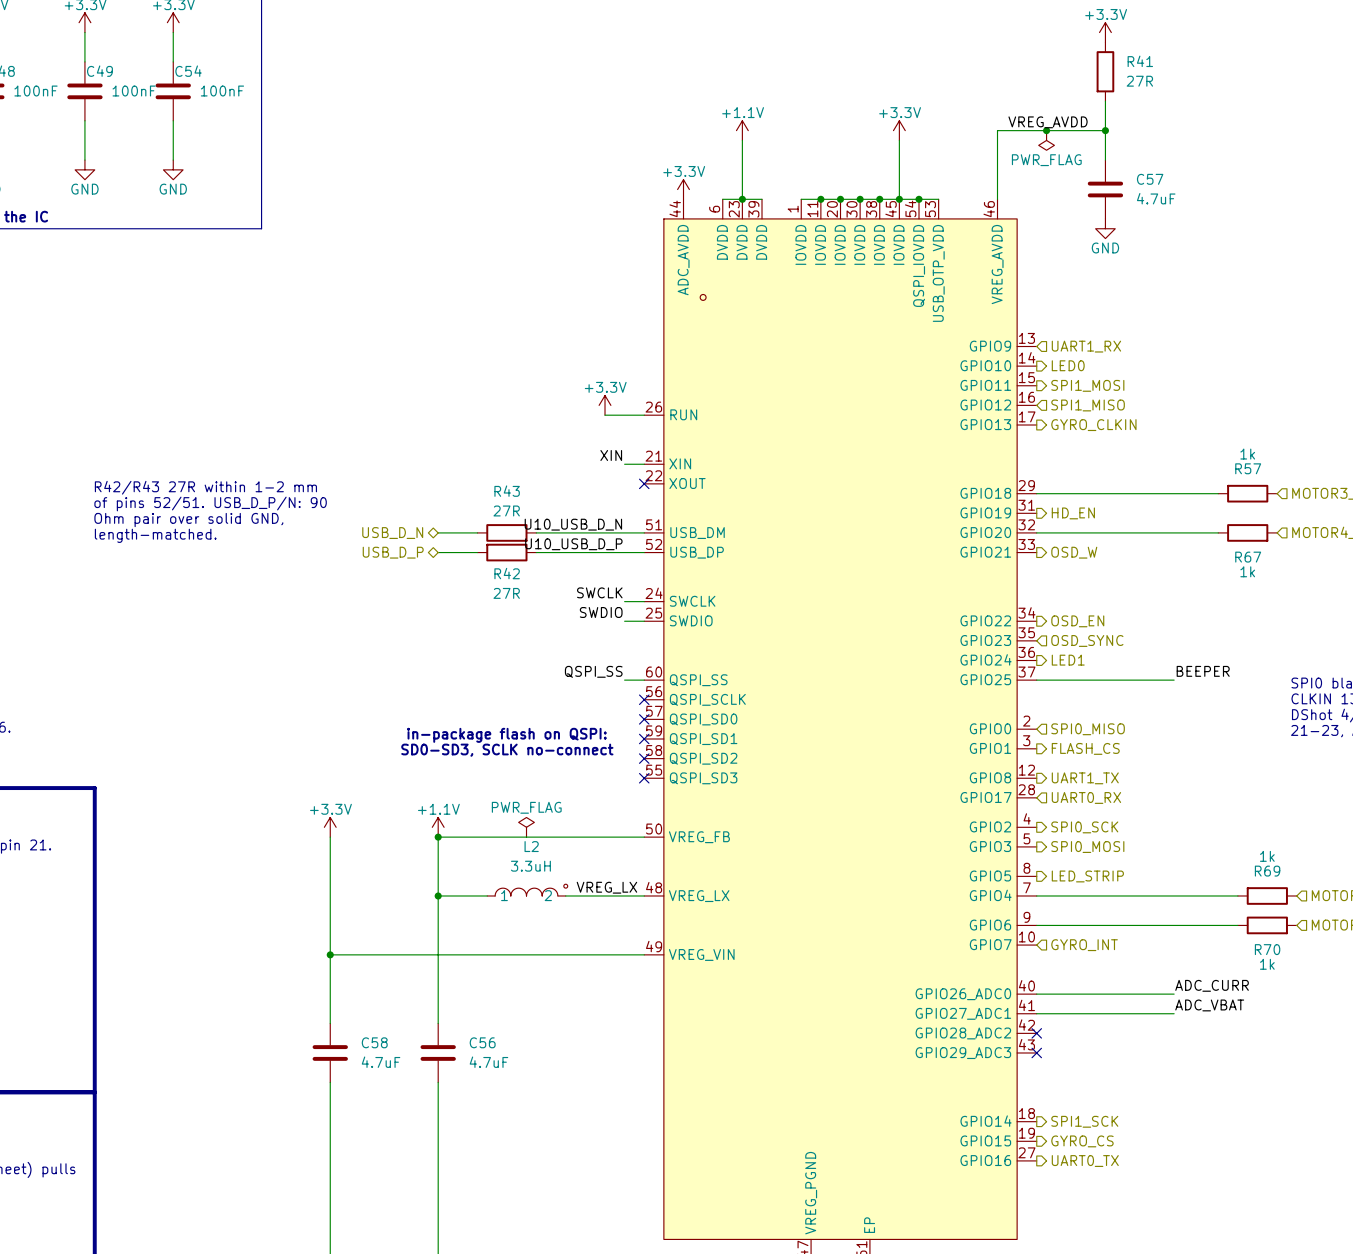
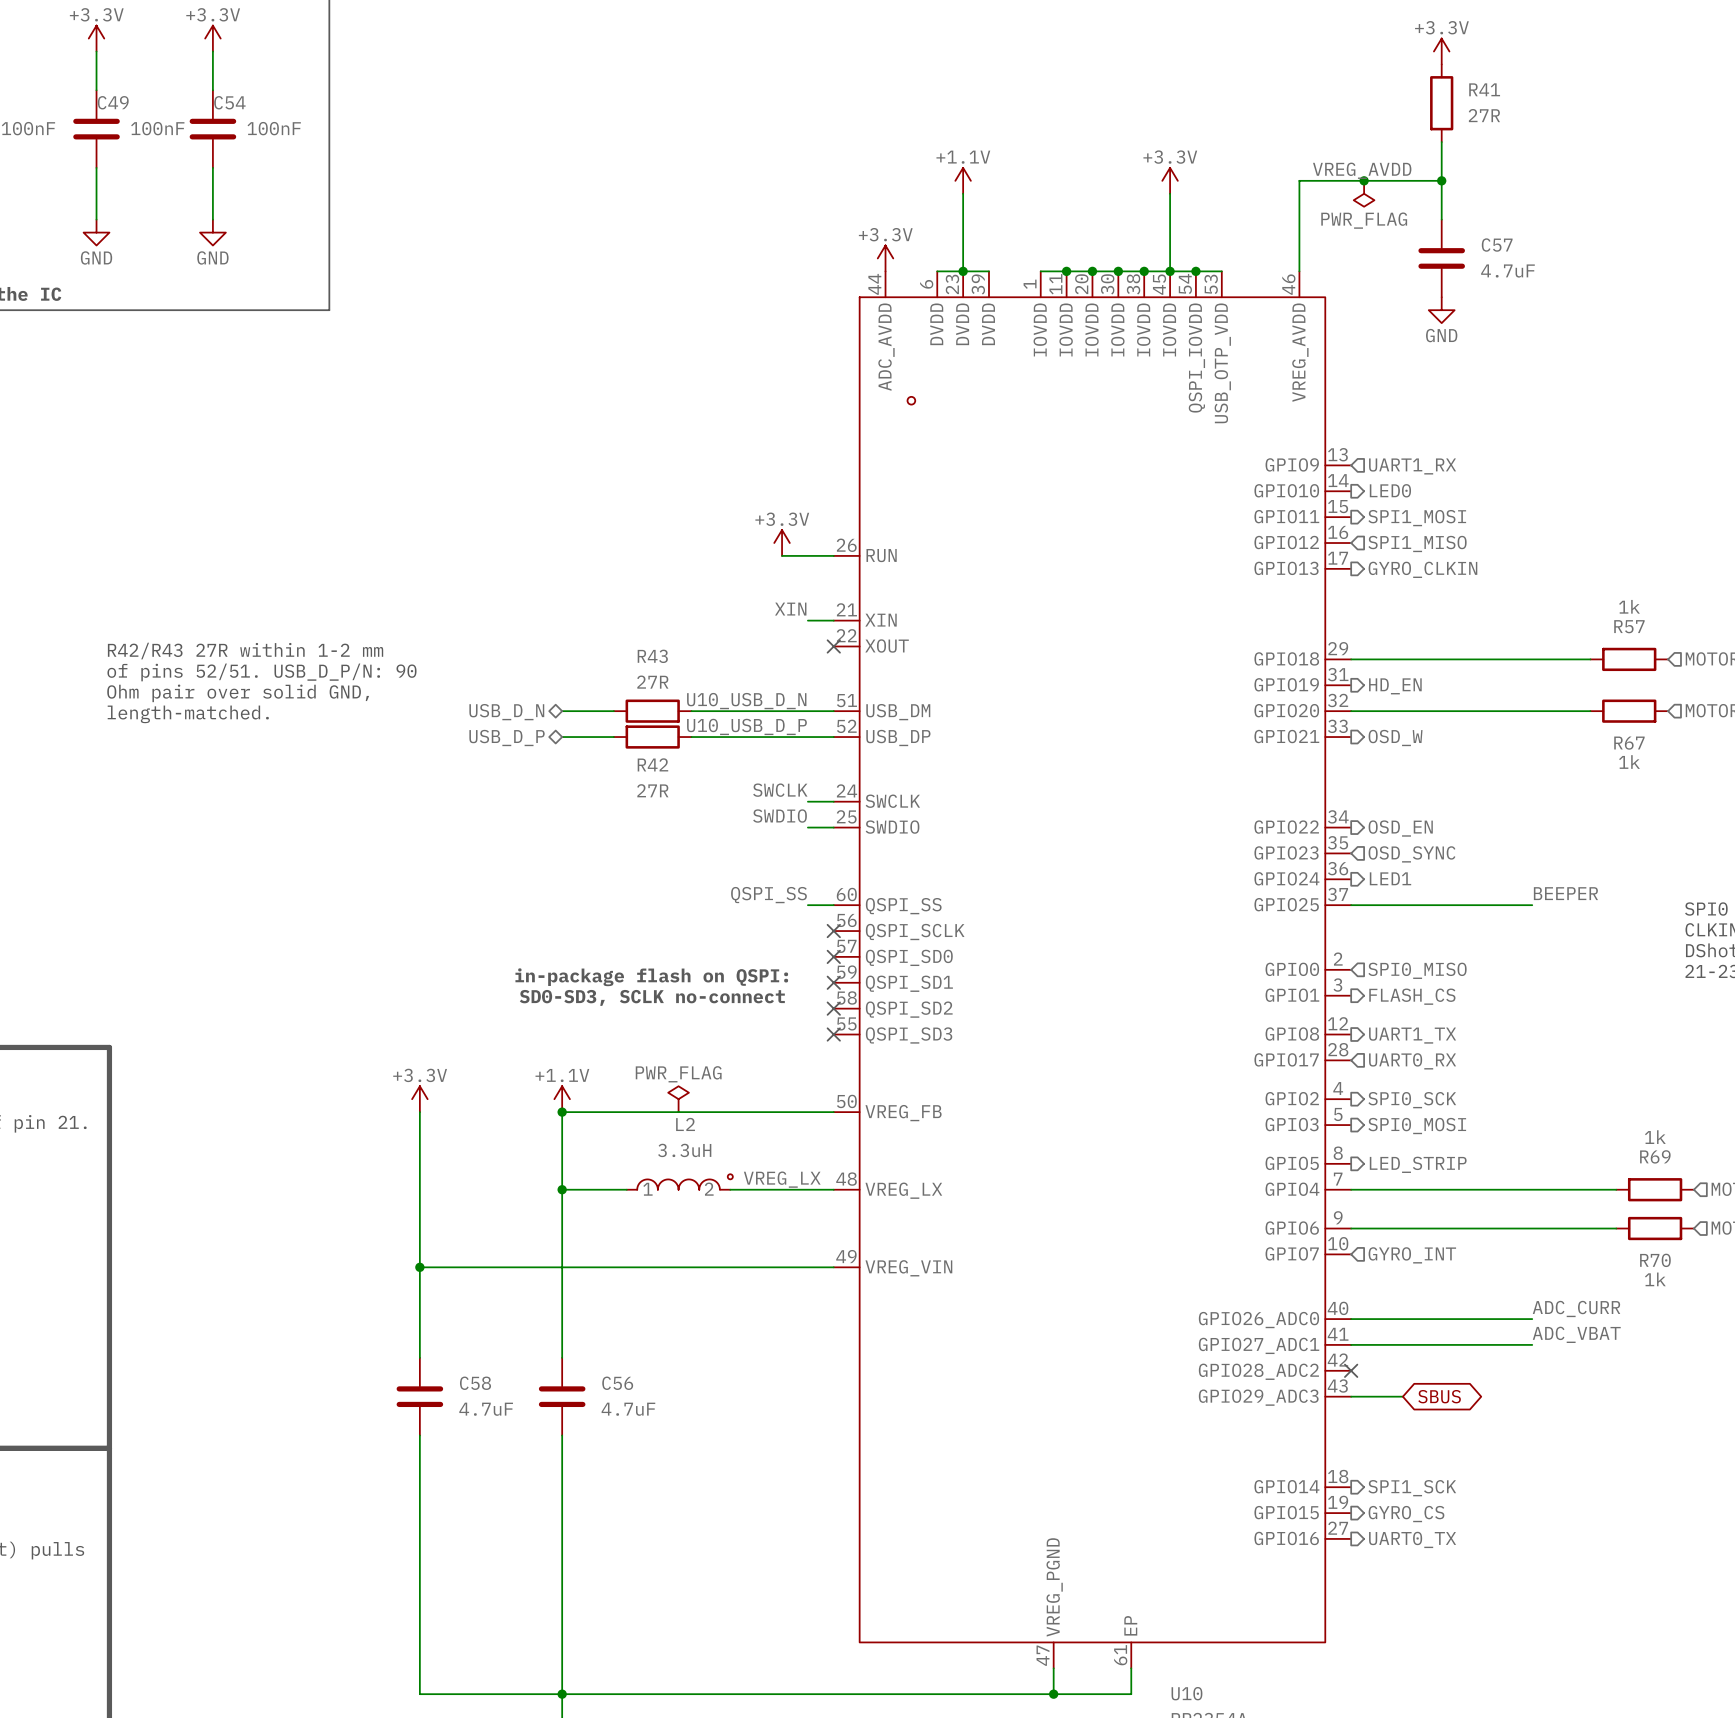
wire: none -> (1351, 1396) (1402, 1396)
no-connect mark: (1036, 1052) -> none
global label: none -> SBUS (1439, 1396)

